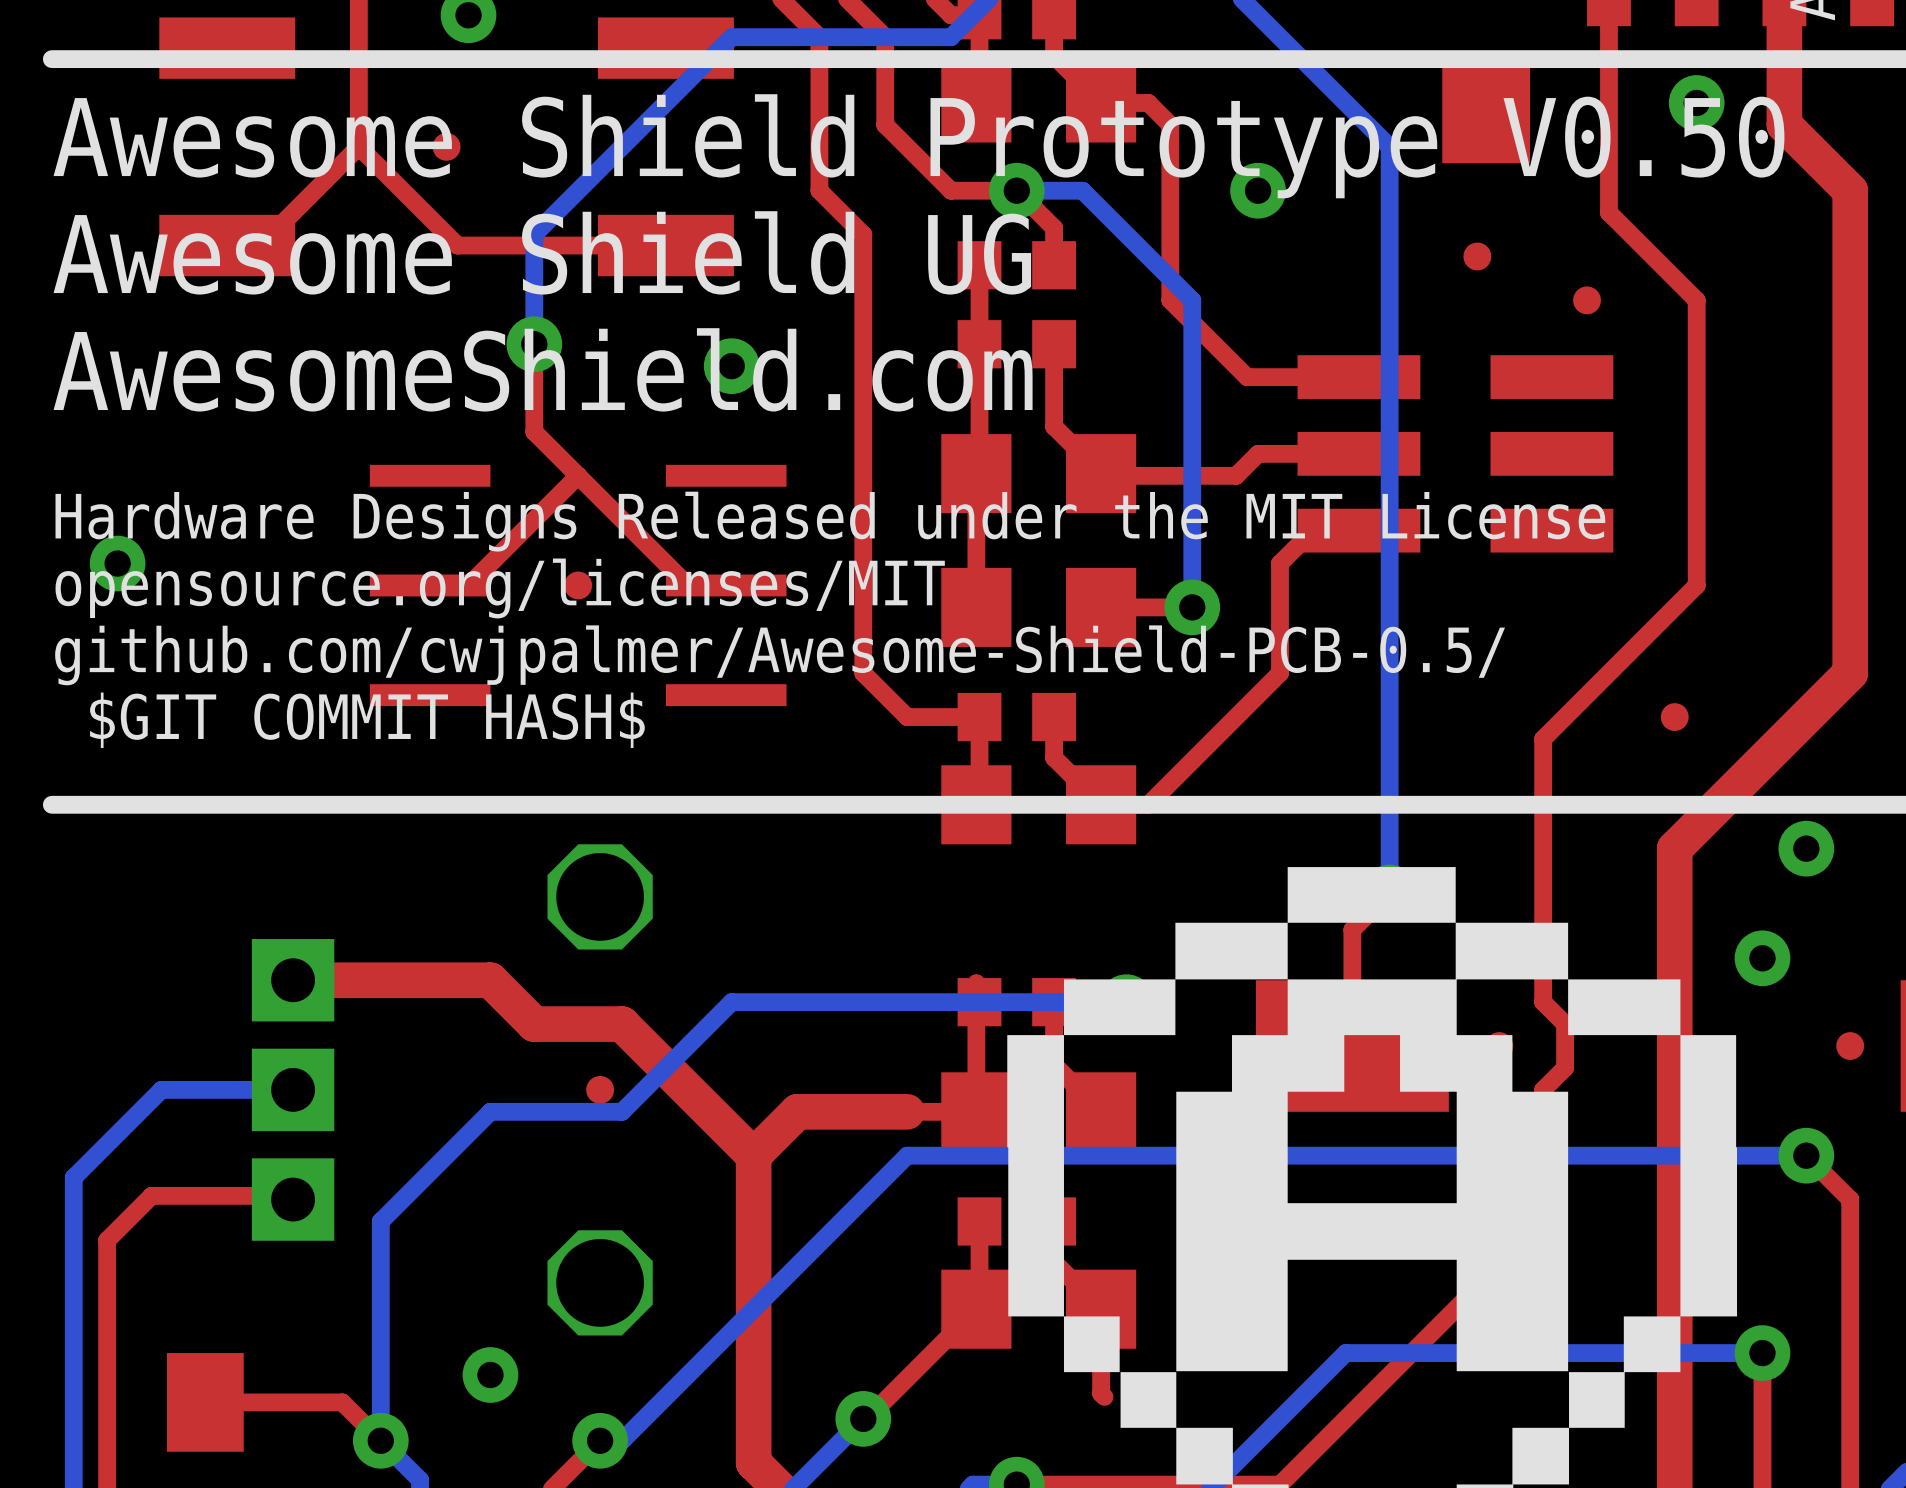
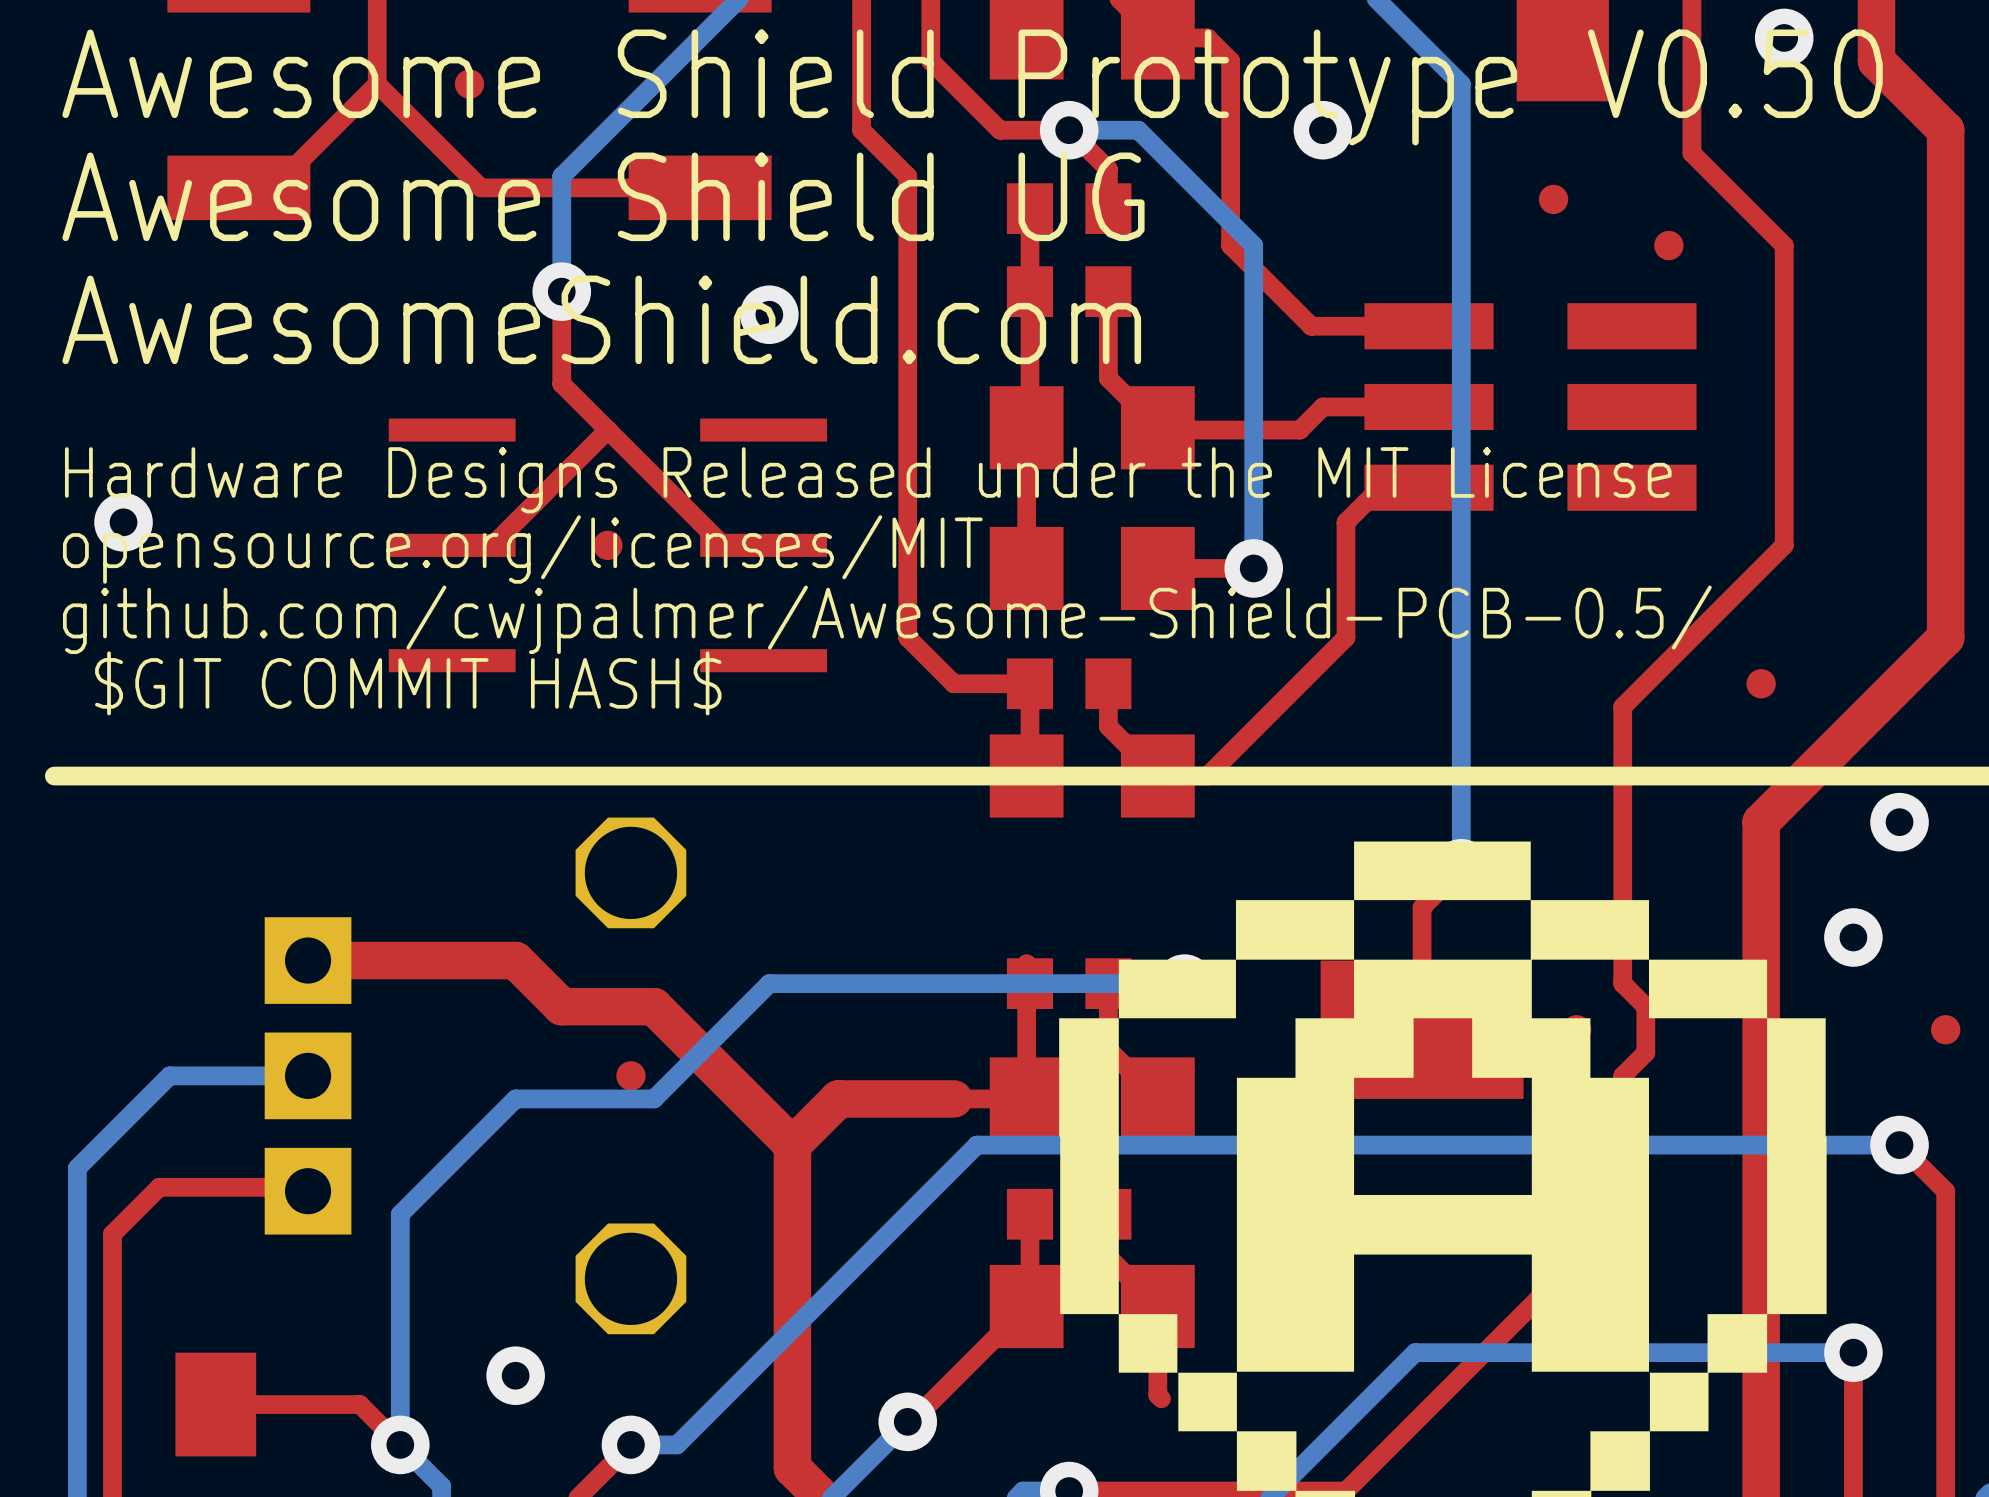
bottom track: (929, 1155) (907, 1155) (622, 1440) -> (976, 1145) (677, 1444) (654, 1444)

